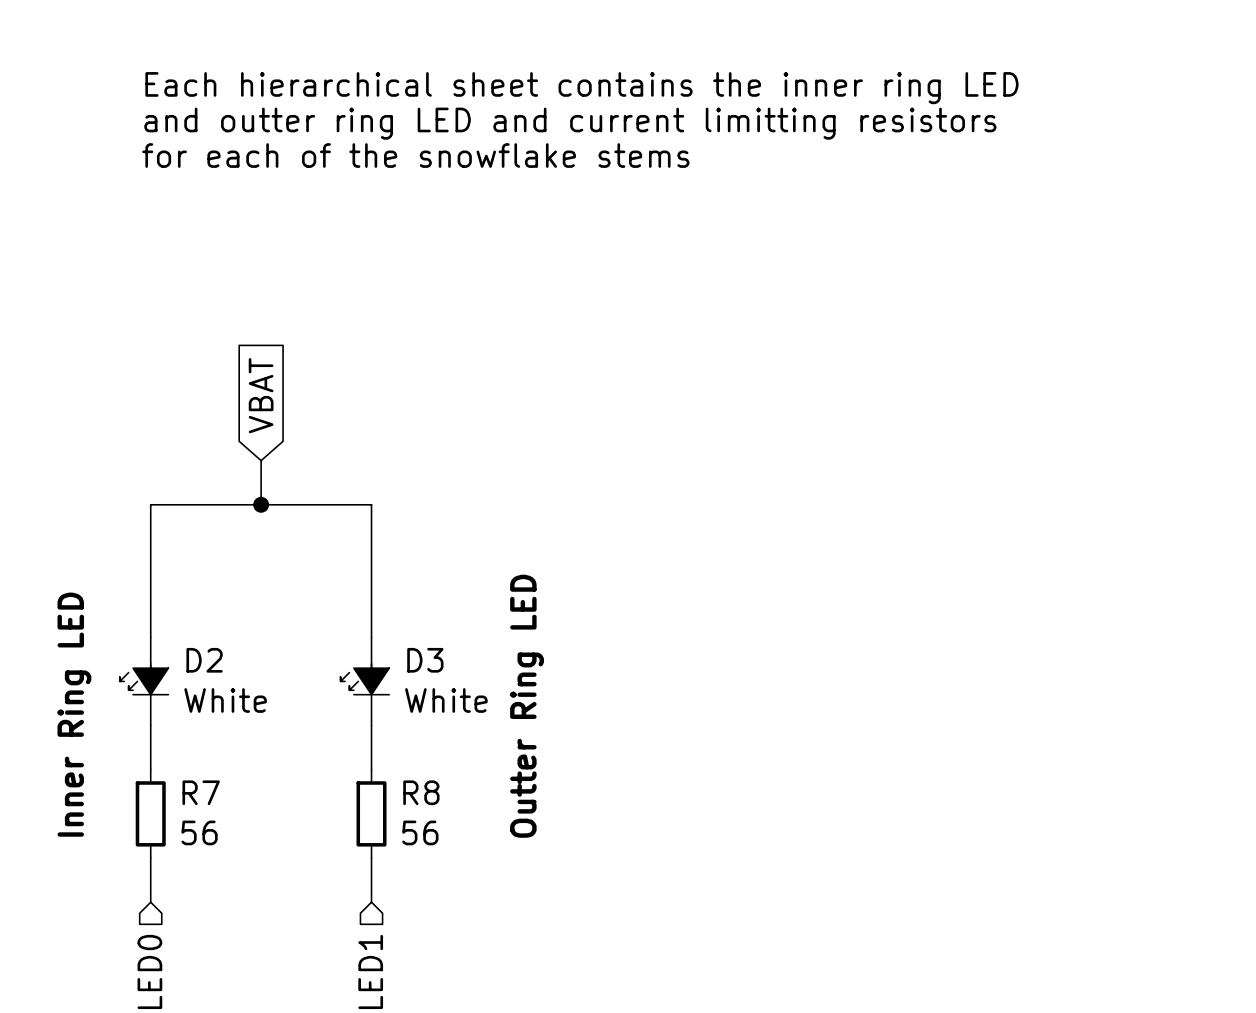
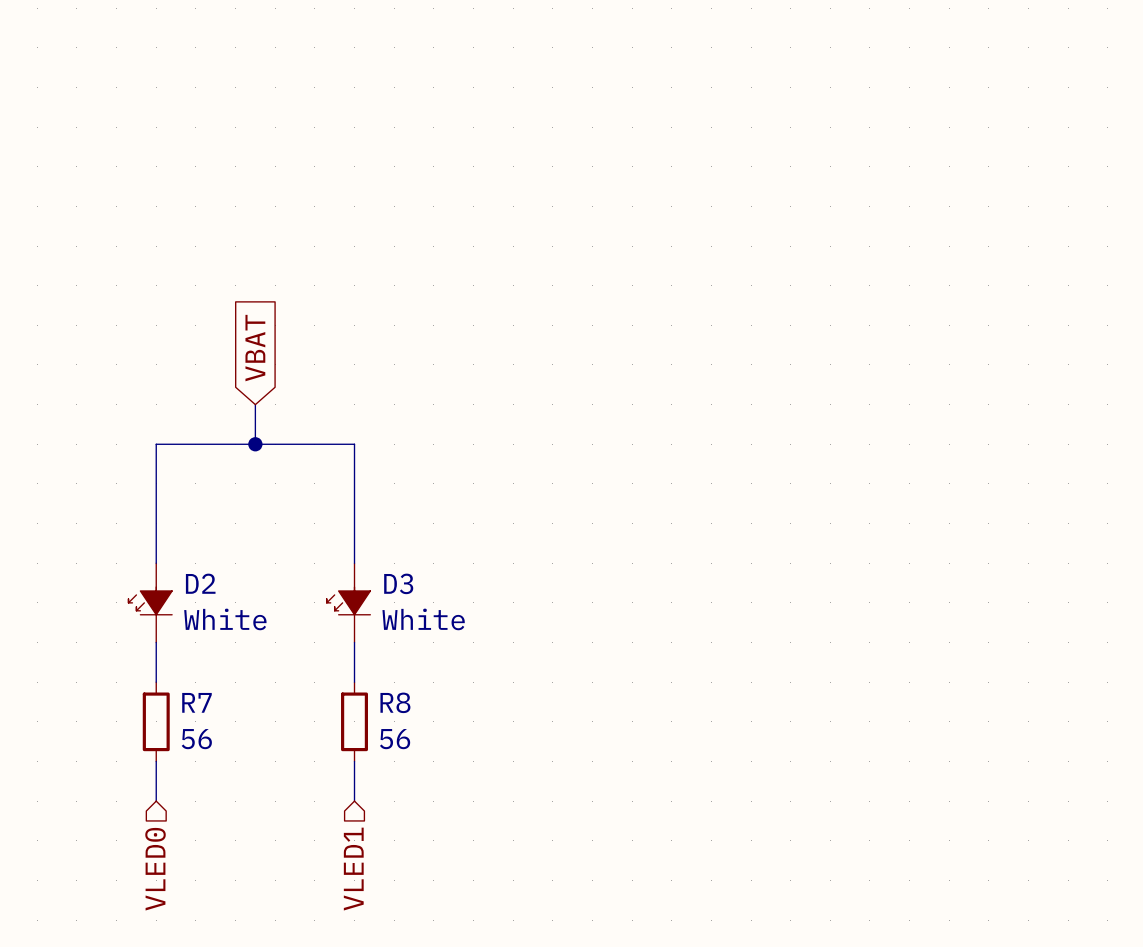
text: Each hierarchical sheet contains the inner ring LED (581, 88) -> none
text: and outter ring LED and current limitting resistors (570, 123) -> none
text: for each of the snowflake stems (415, 155) -> none
text: Outter Ring LED (527, 706) -> none
text: Inner Ring LED (74, 714) -> none

